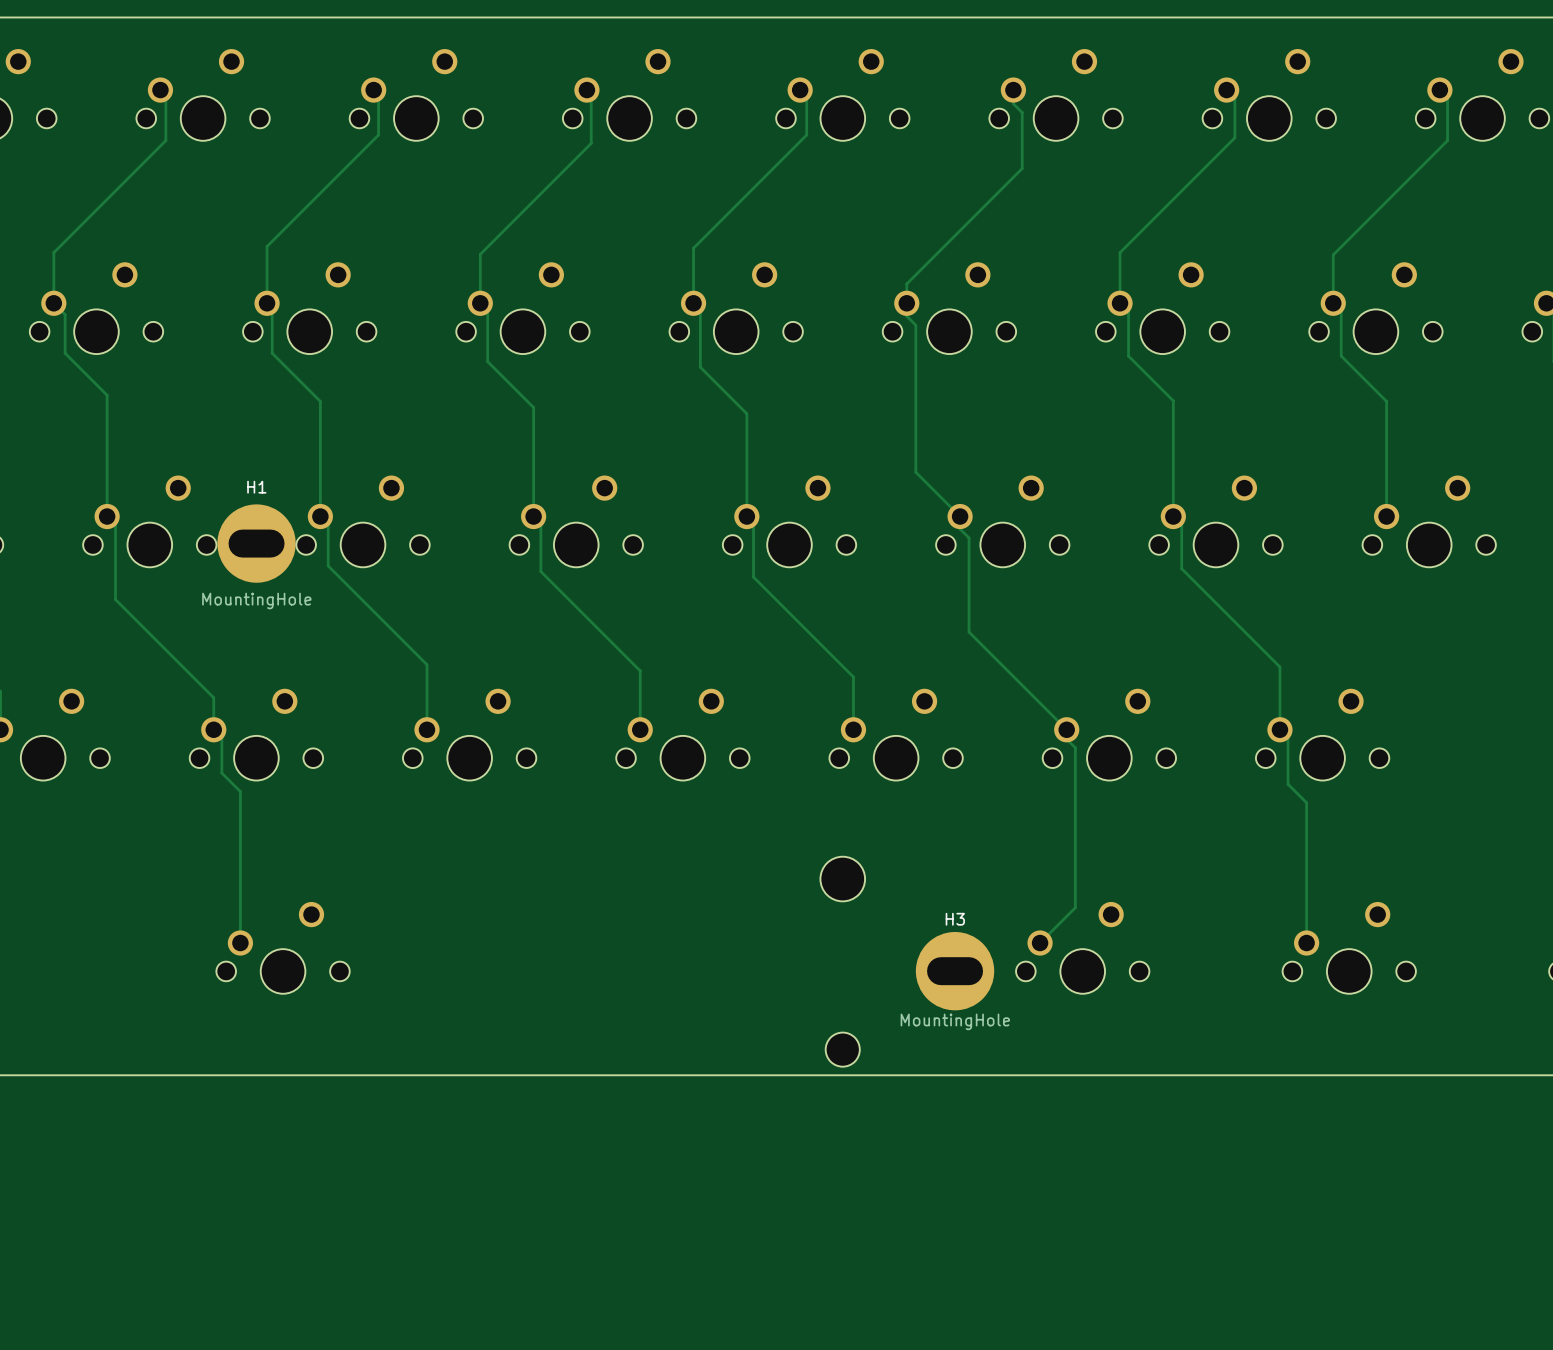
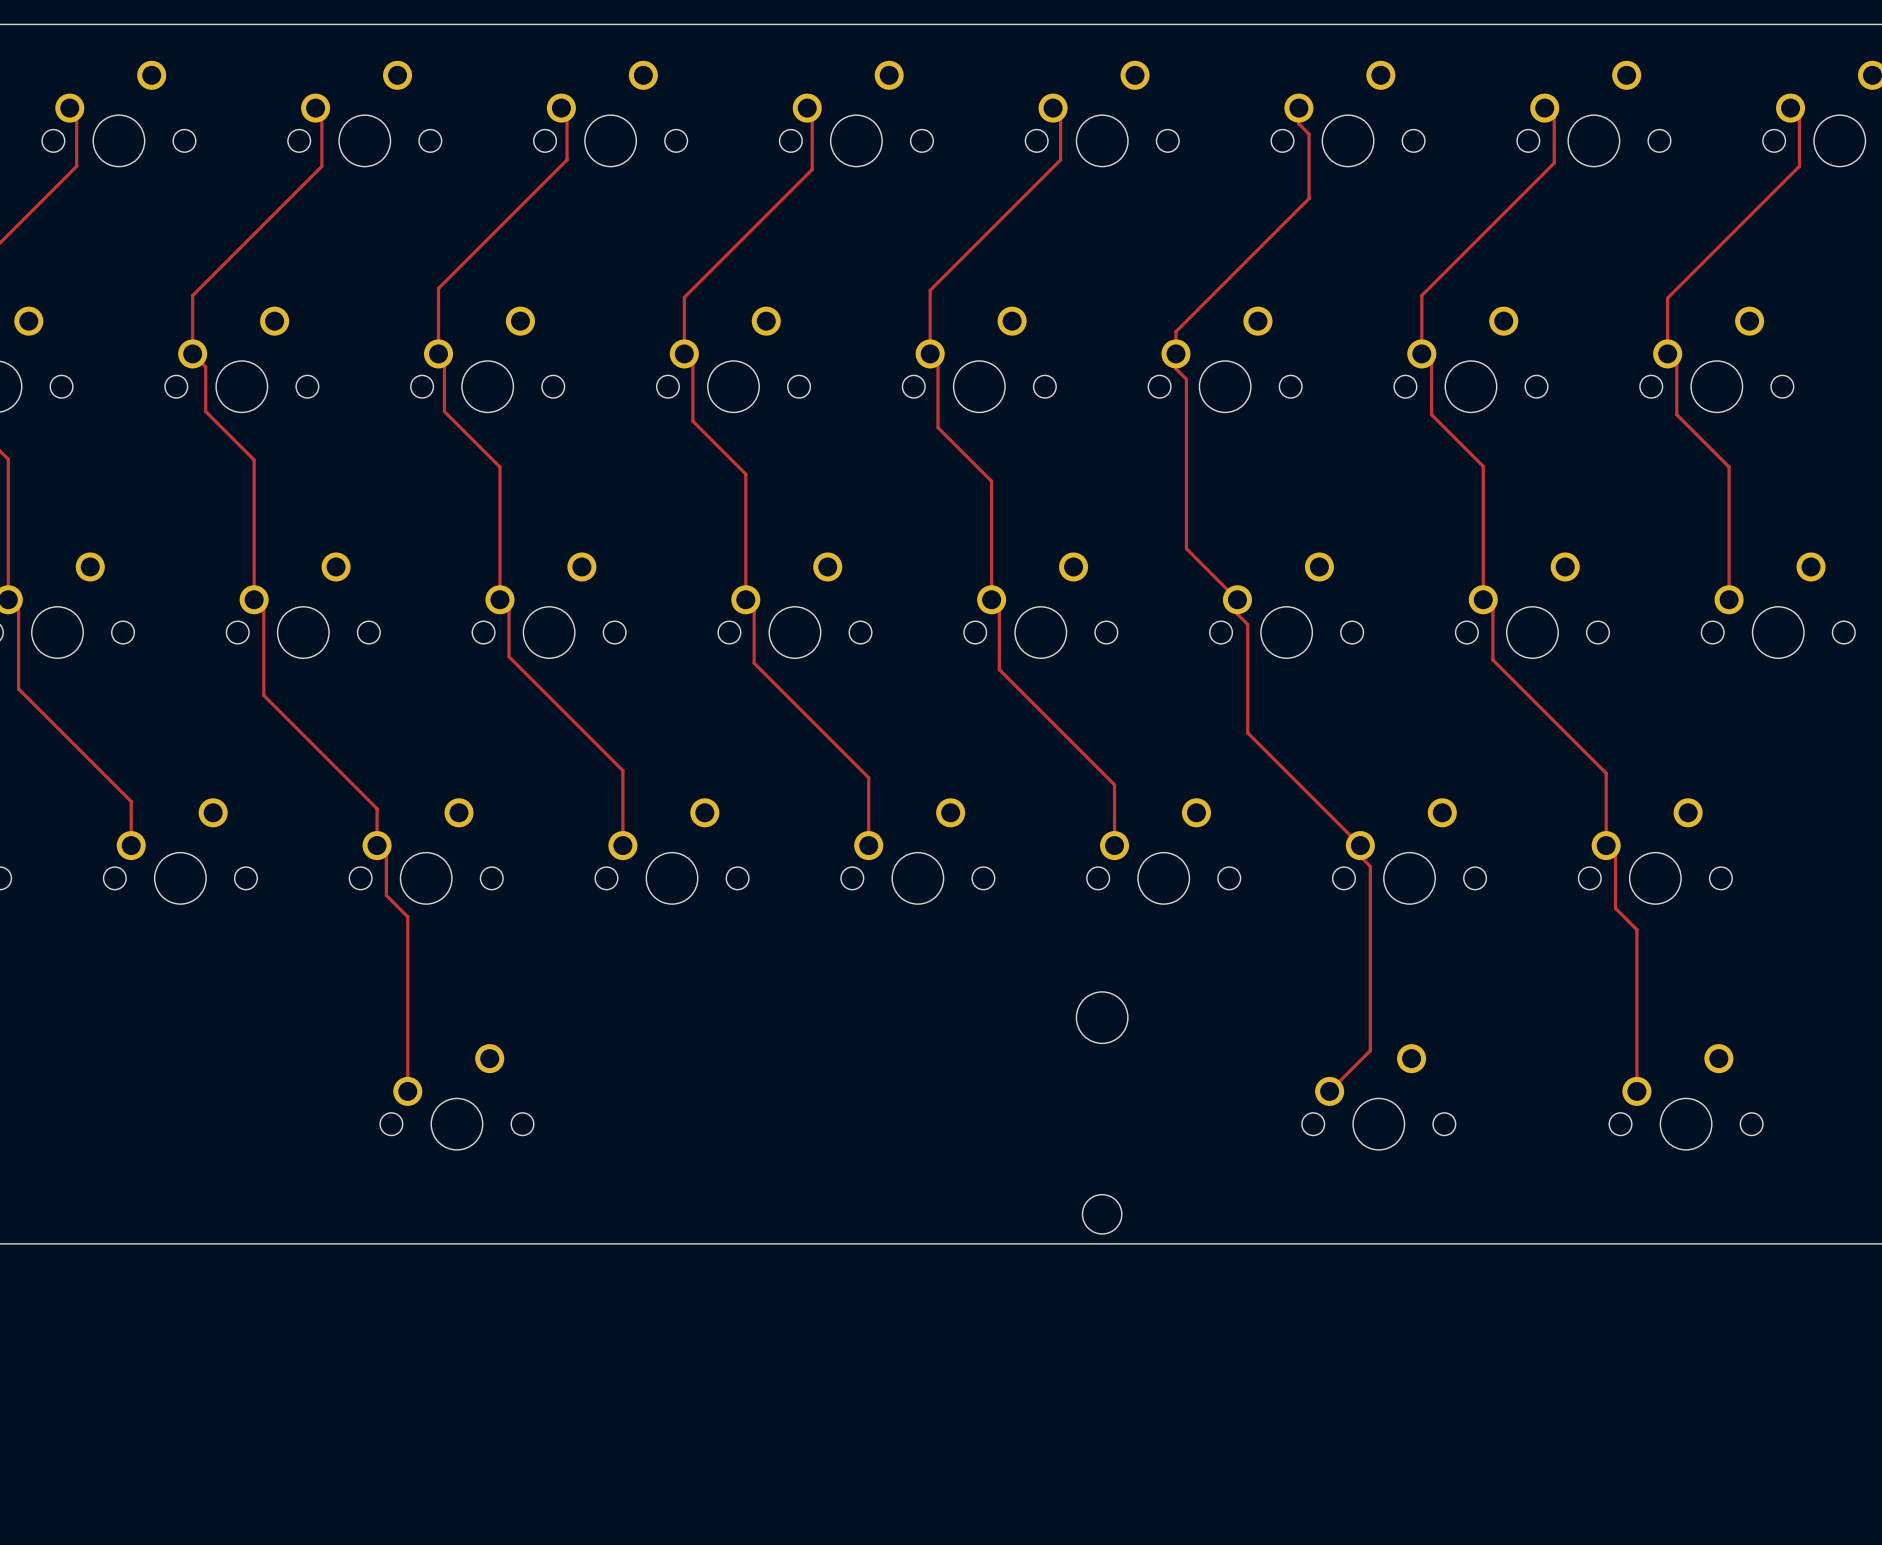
H1: MountingHole (256, 543) -> none
H3: MountingHole (955, 971) -> none

